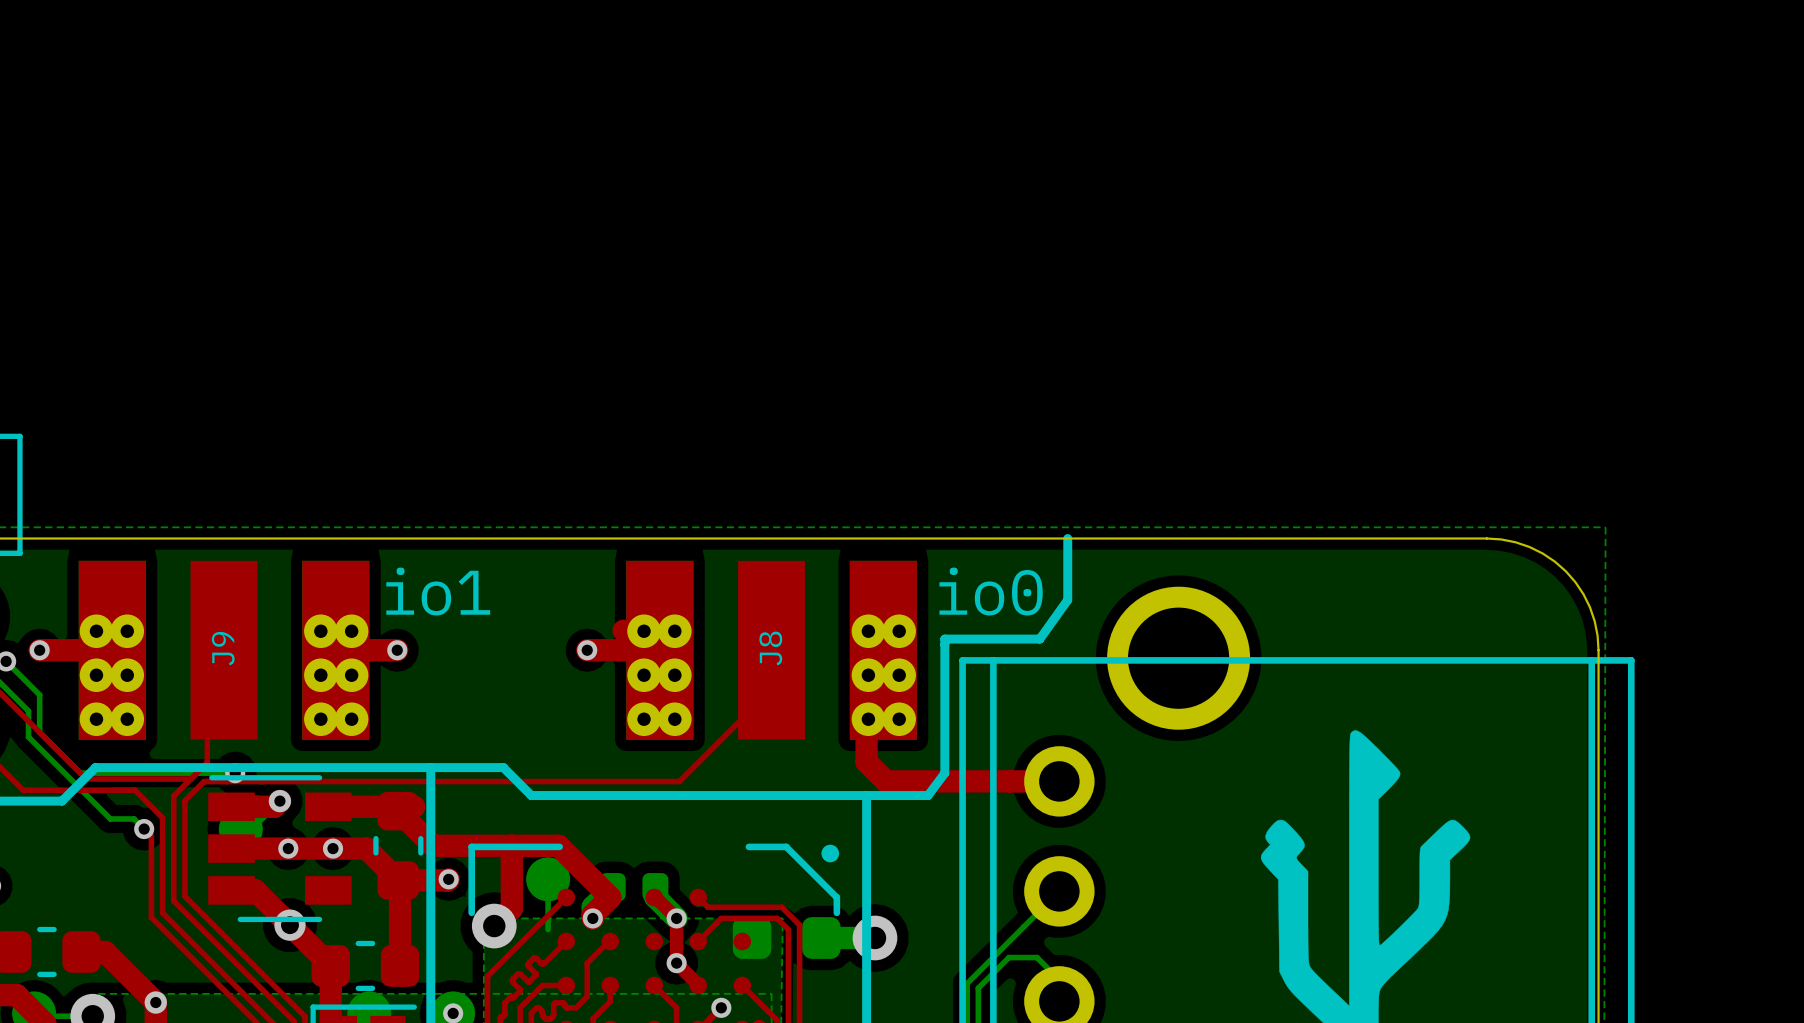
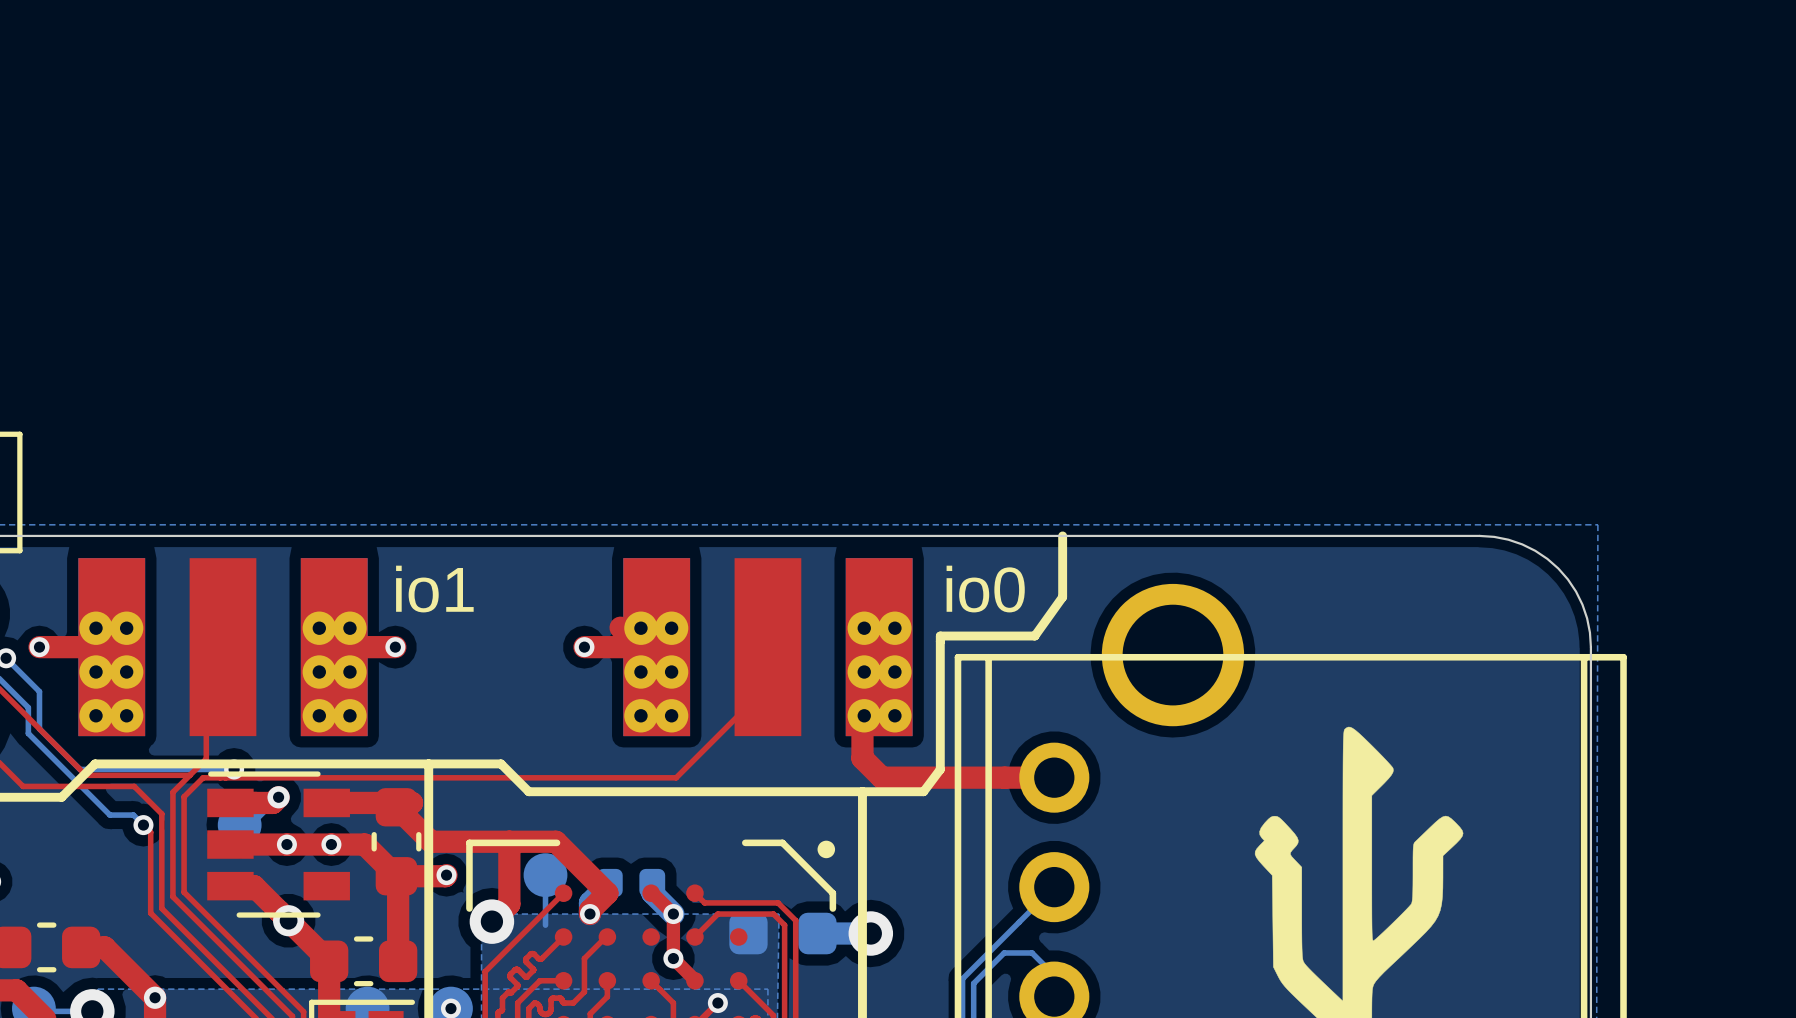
J9 name: J9 (223, 648) -> none
J8 name: J8 (770, 648) -> none

